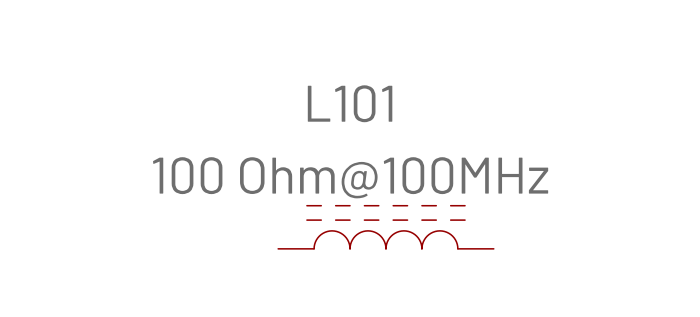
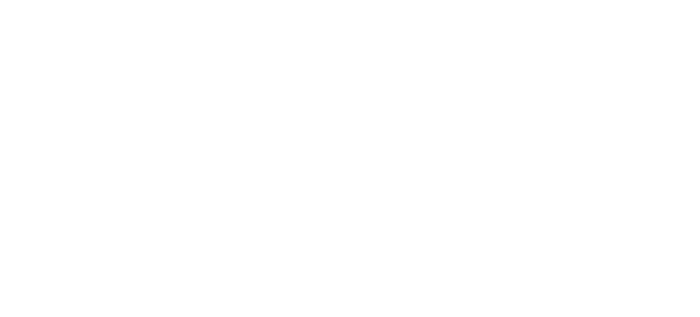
L101: 100 Ohm@100MHz (385, 227) -> none

